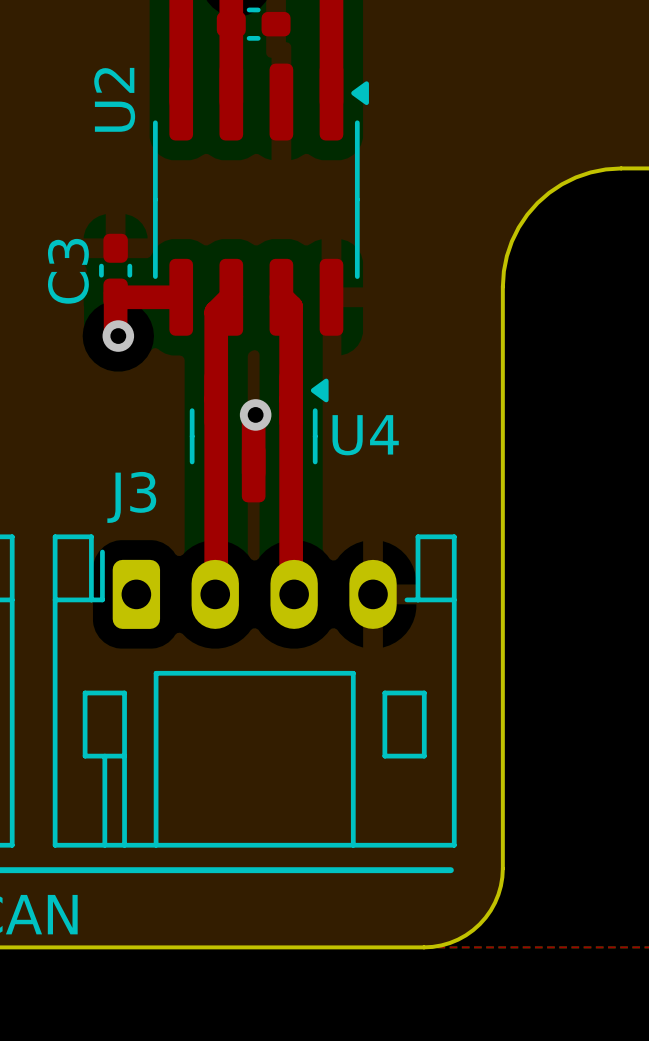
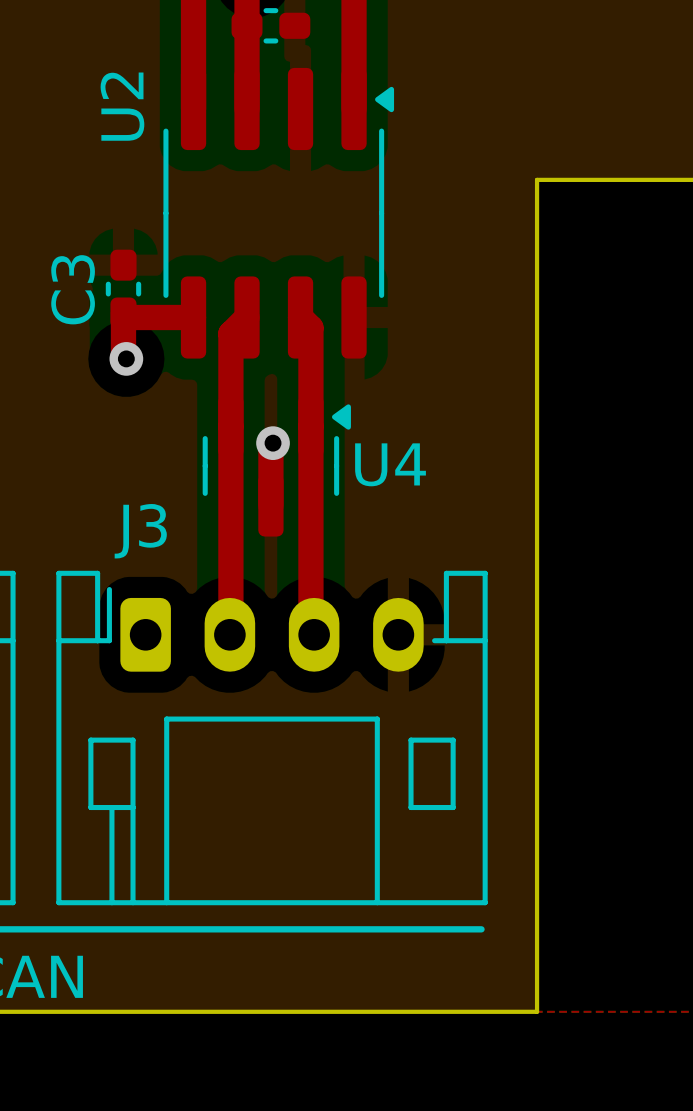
board edge: (621, 168) (590, 172) (575, 177) (549, 192) (537, 203) (527, 214) (511, 241) (506, 256) (502, 286) -> (663, 179) (537, 179) (537, 306)
board edge: (502, 868) (498, 894) (490, 910) (479, 924) (465, 935) (450, 942) (423, 947) -> (537, 927) (537, 1011) (452, 1011)

